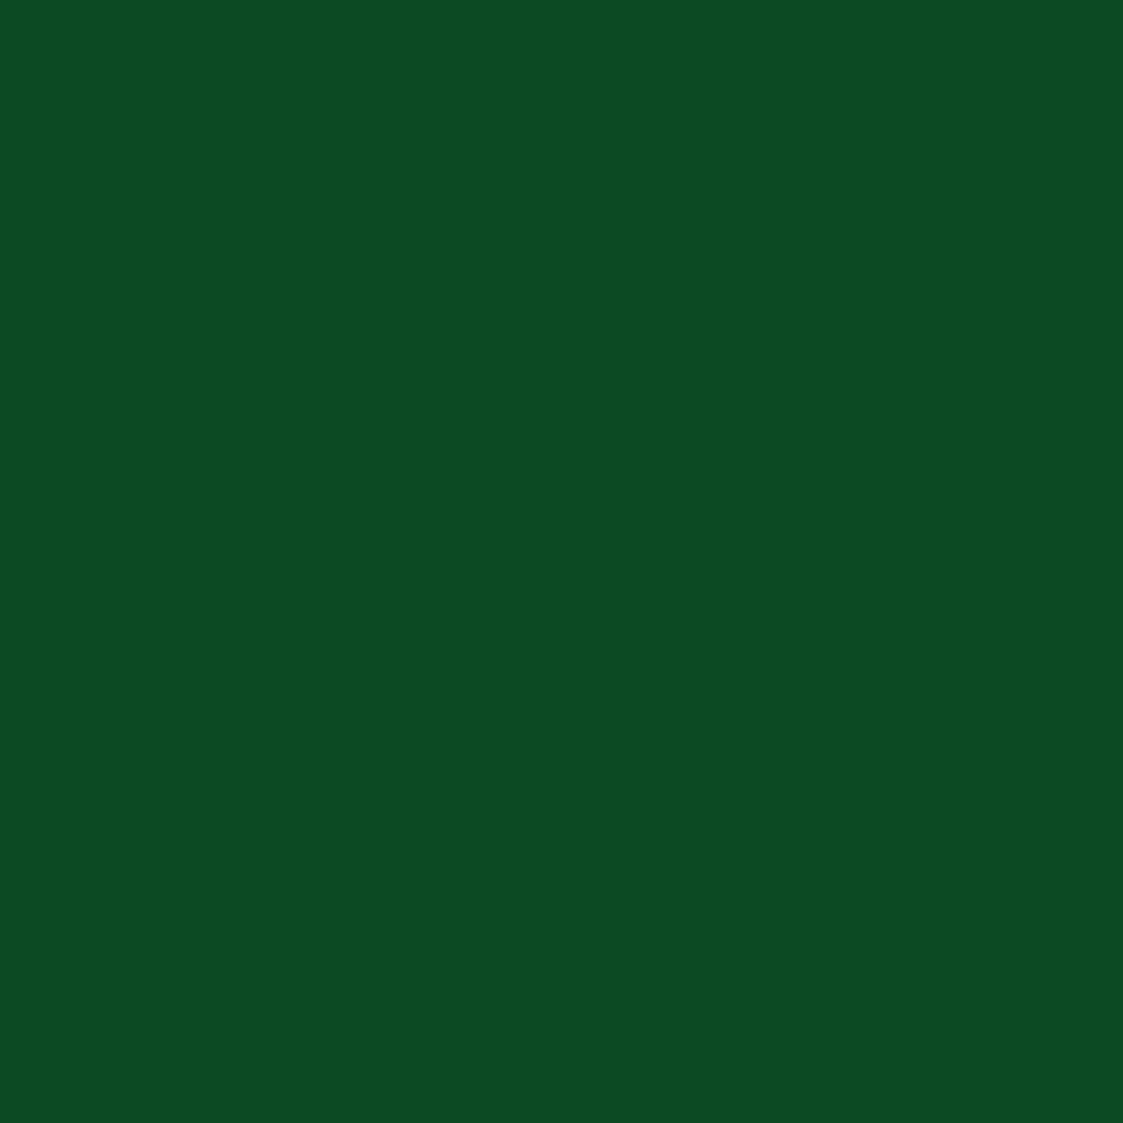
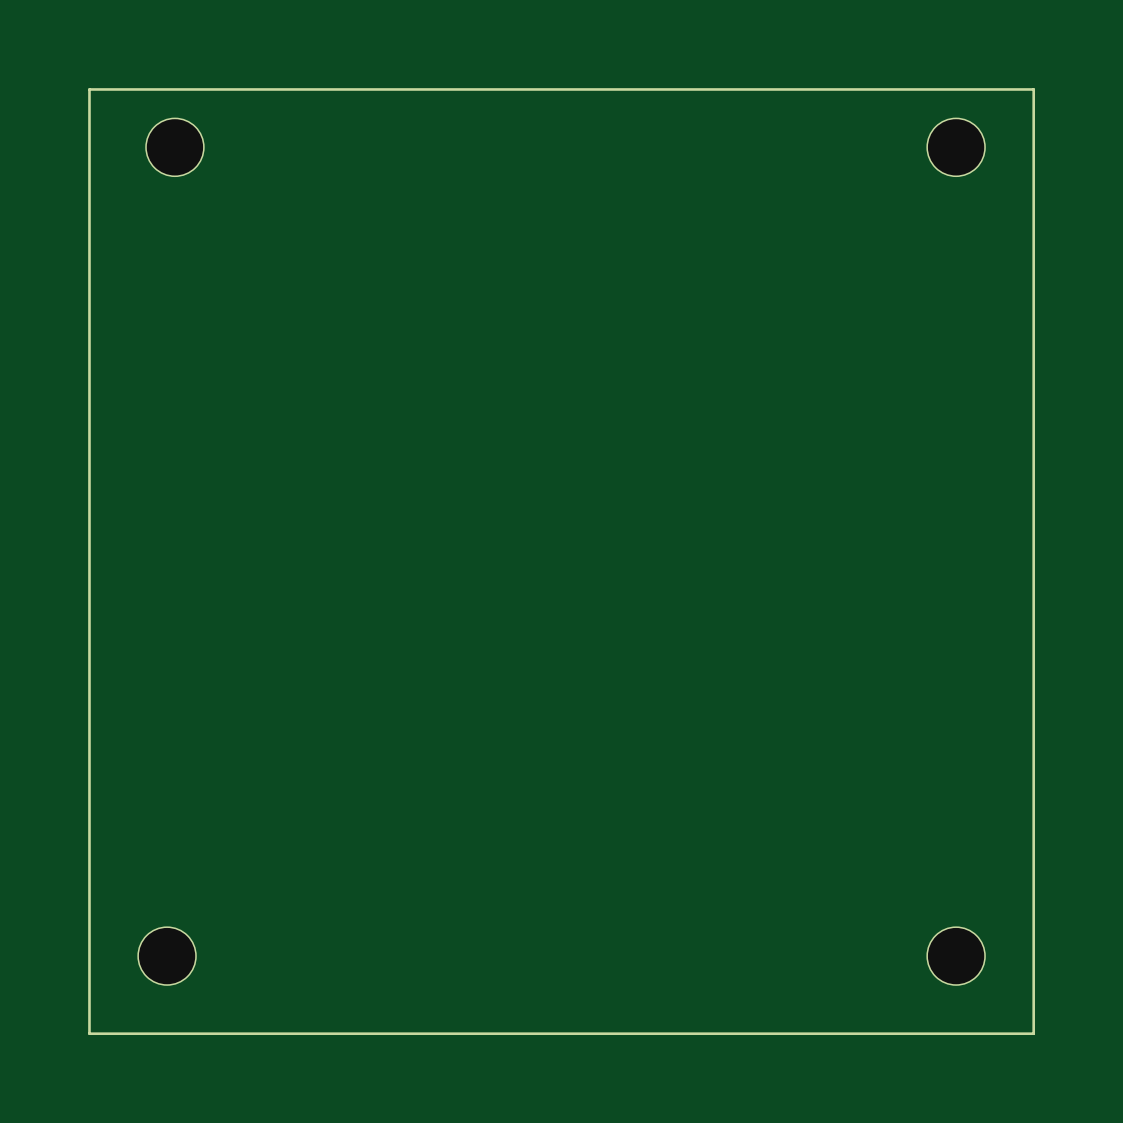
board edge: none -> (1033, 89) (89, 89) (89, 1033) (1033, 1033) (1033, 89)
part: none -> (174, 147)
part: none -> (956, 147)
part: none -> (167, 956)
part: none -> (956, 956)

